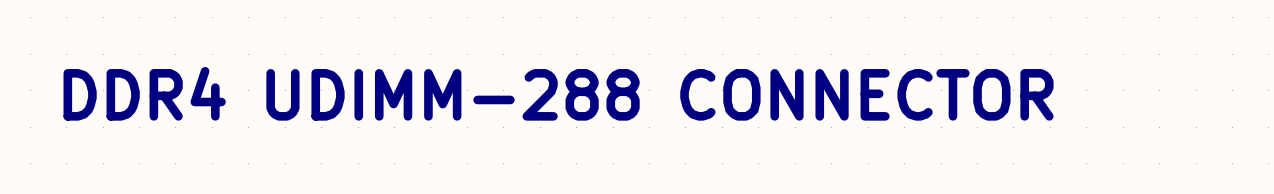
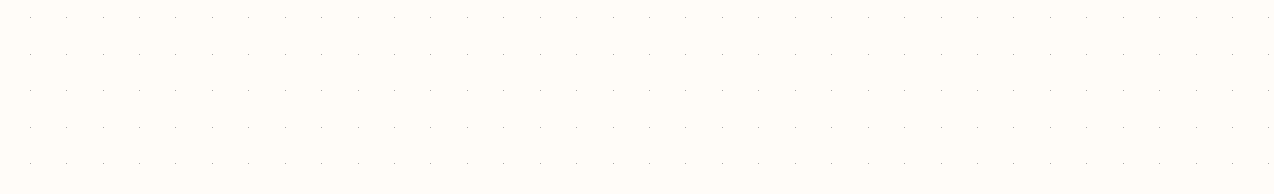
text: DDR4 UDIMM-288 CONNECTOR (558, 93) -> none

